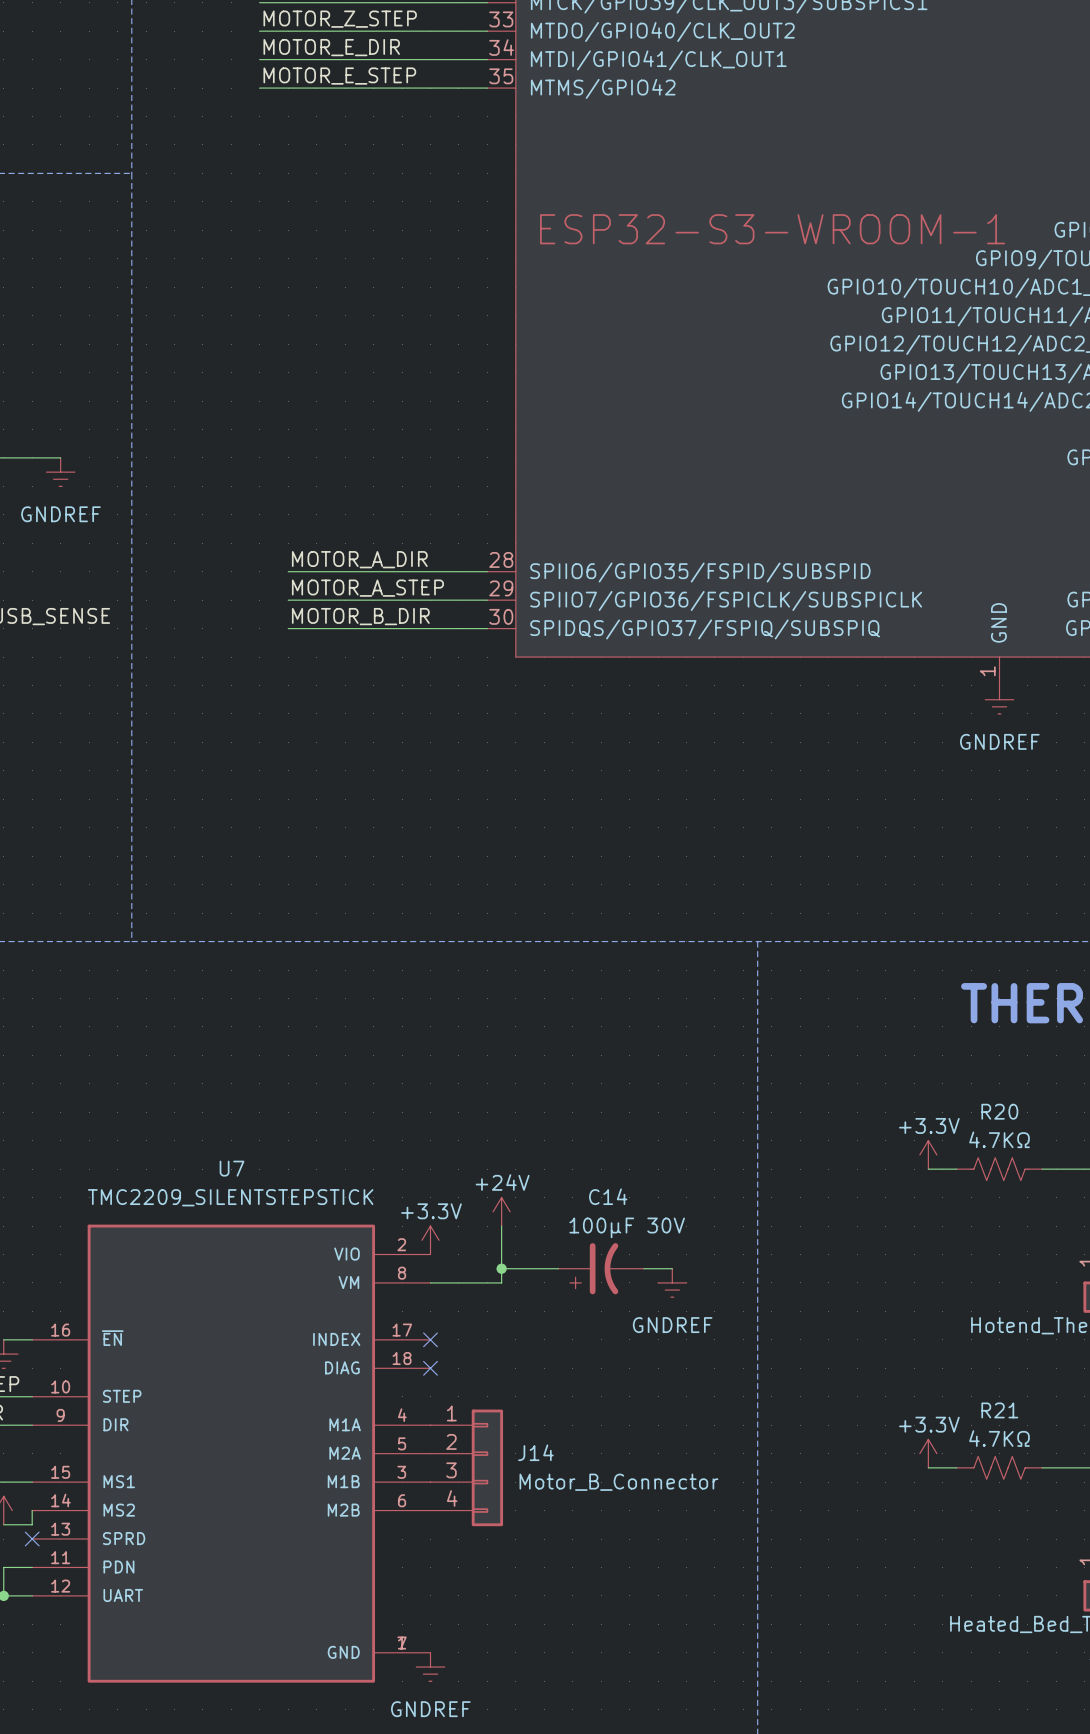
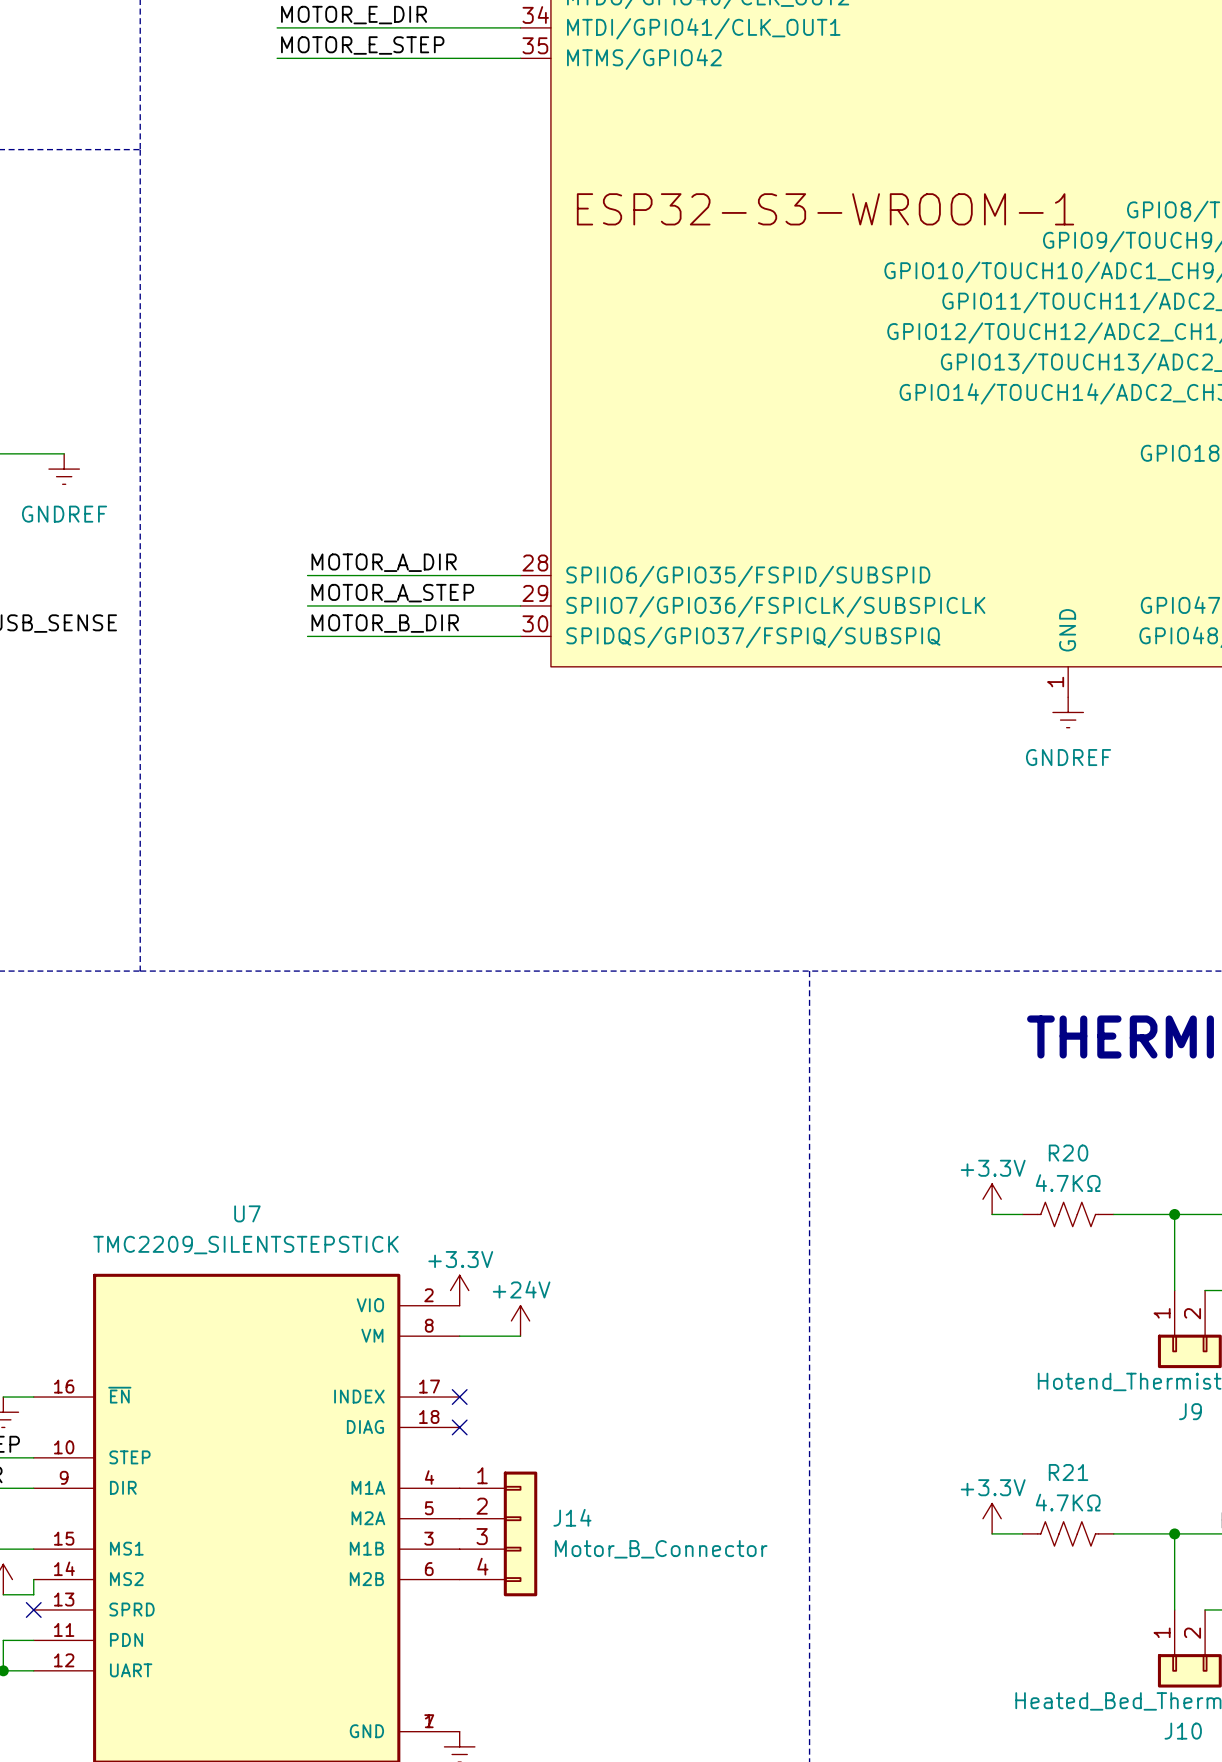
power symbol position: +24V (501, 1211) -> +24V (520, 1320)
wire: (501, 1226) (501, 1282) (487, 1282) -> none
wire: (501, 1268) (558, 1268) -> none
junction: (501, 1268) -> none
C14: 100µF 30V (601, 1268) -> none
wire: (643, 1268) (672, 1268) -> none
power symbol: GNDREF (672, 1282) -> none

